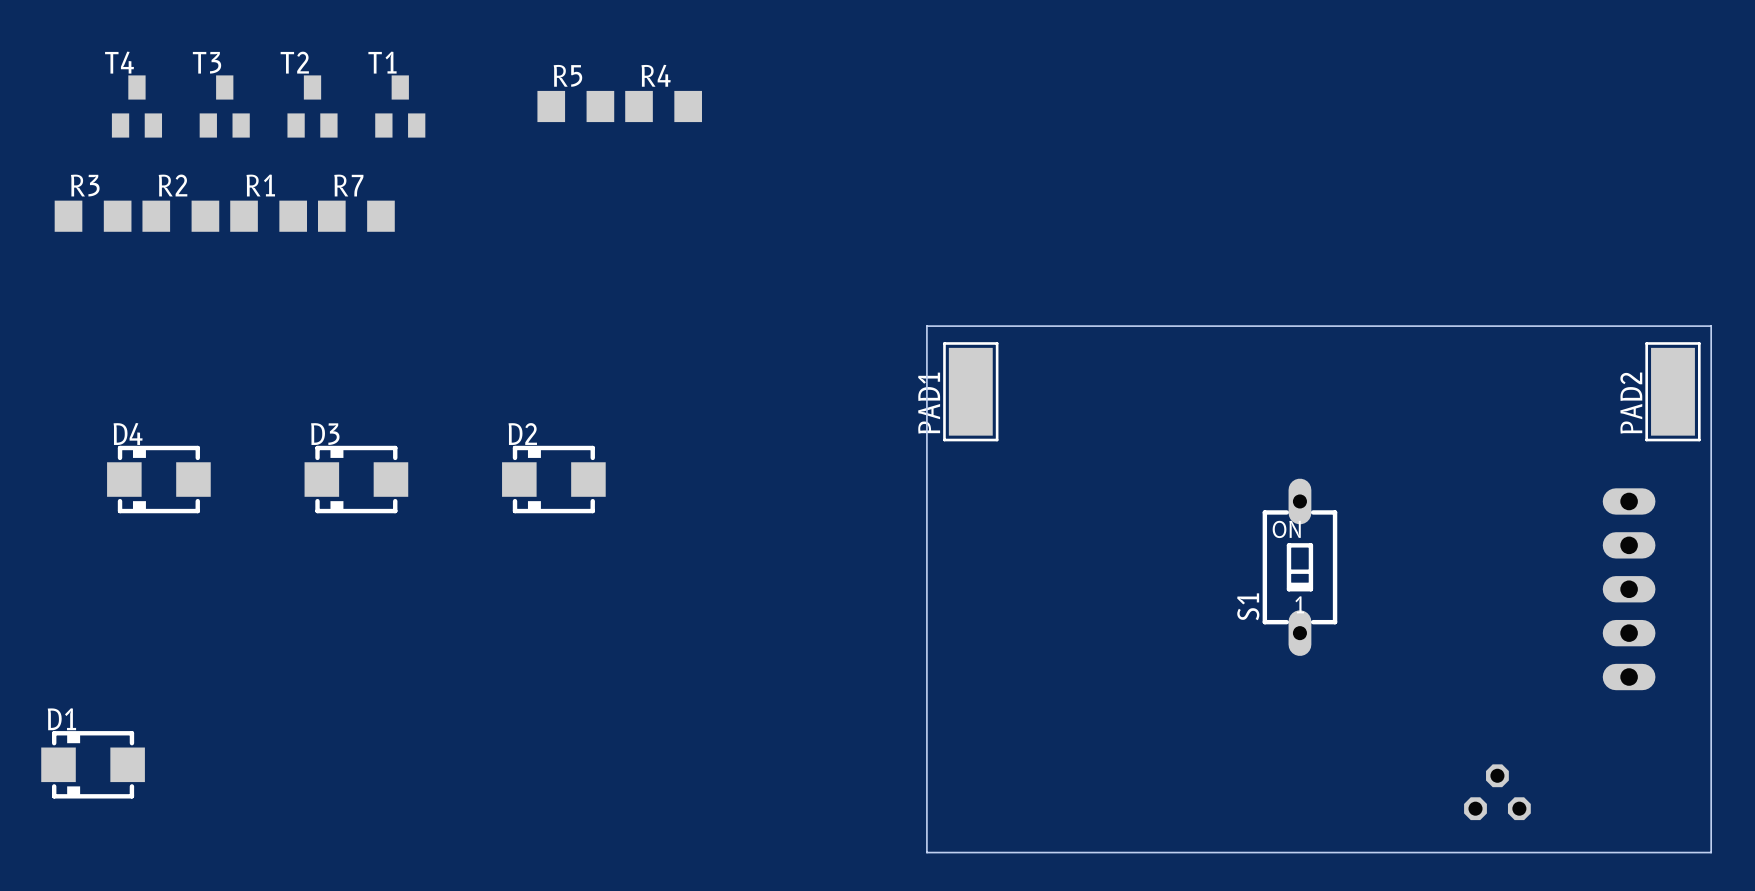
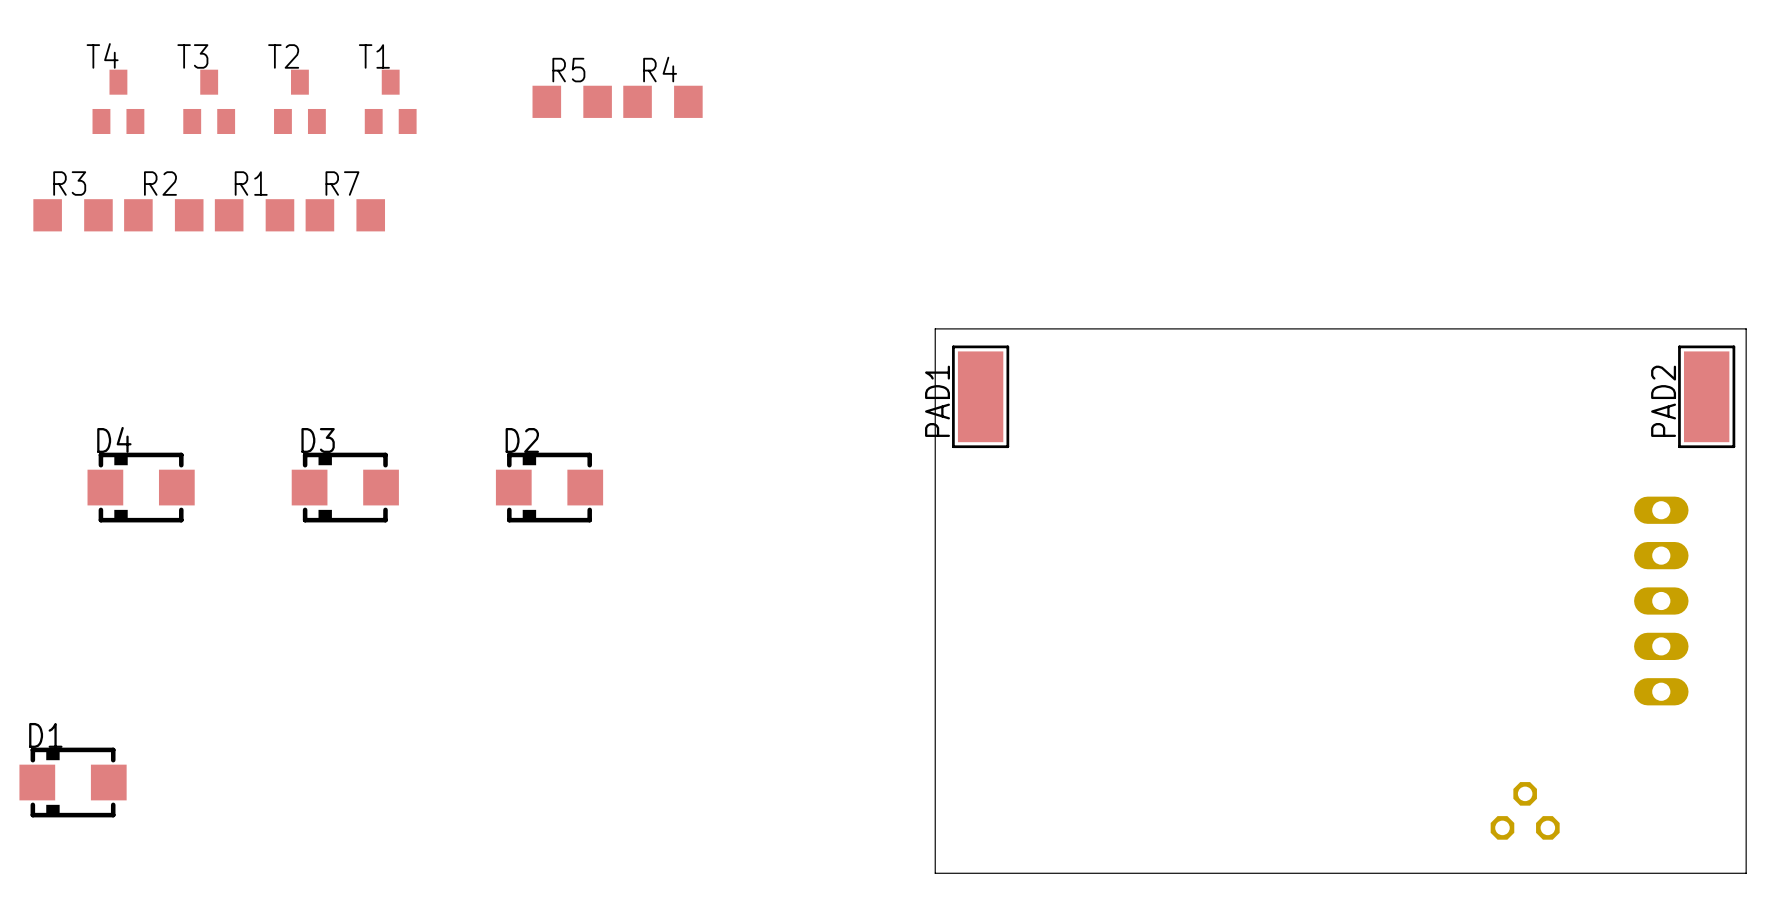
S1: (1299, 567) -> none

